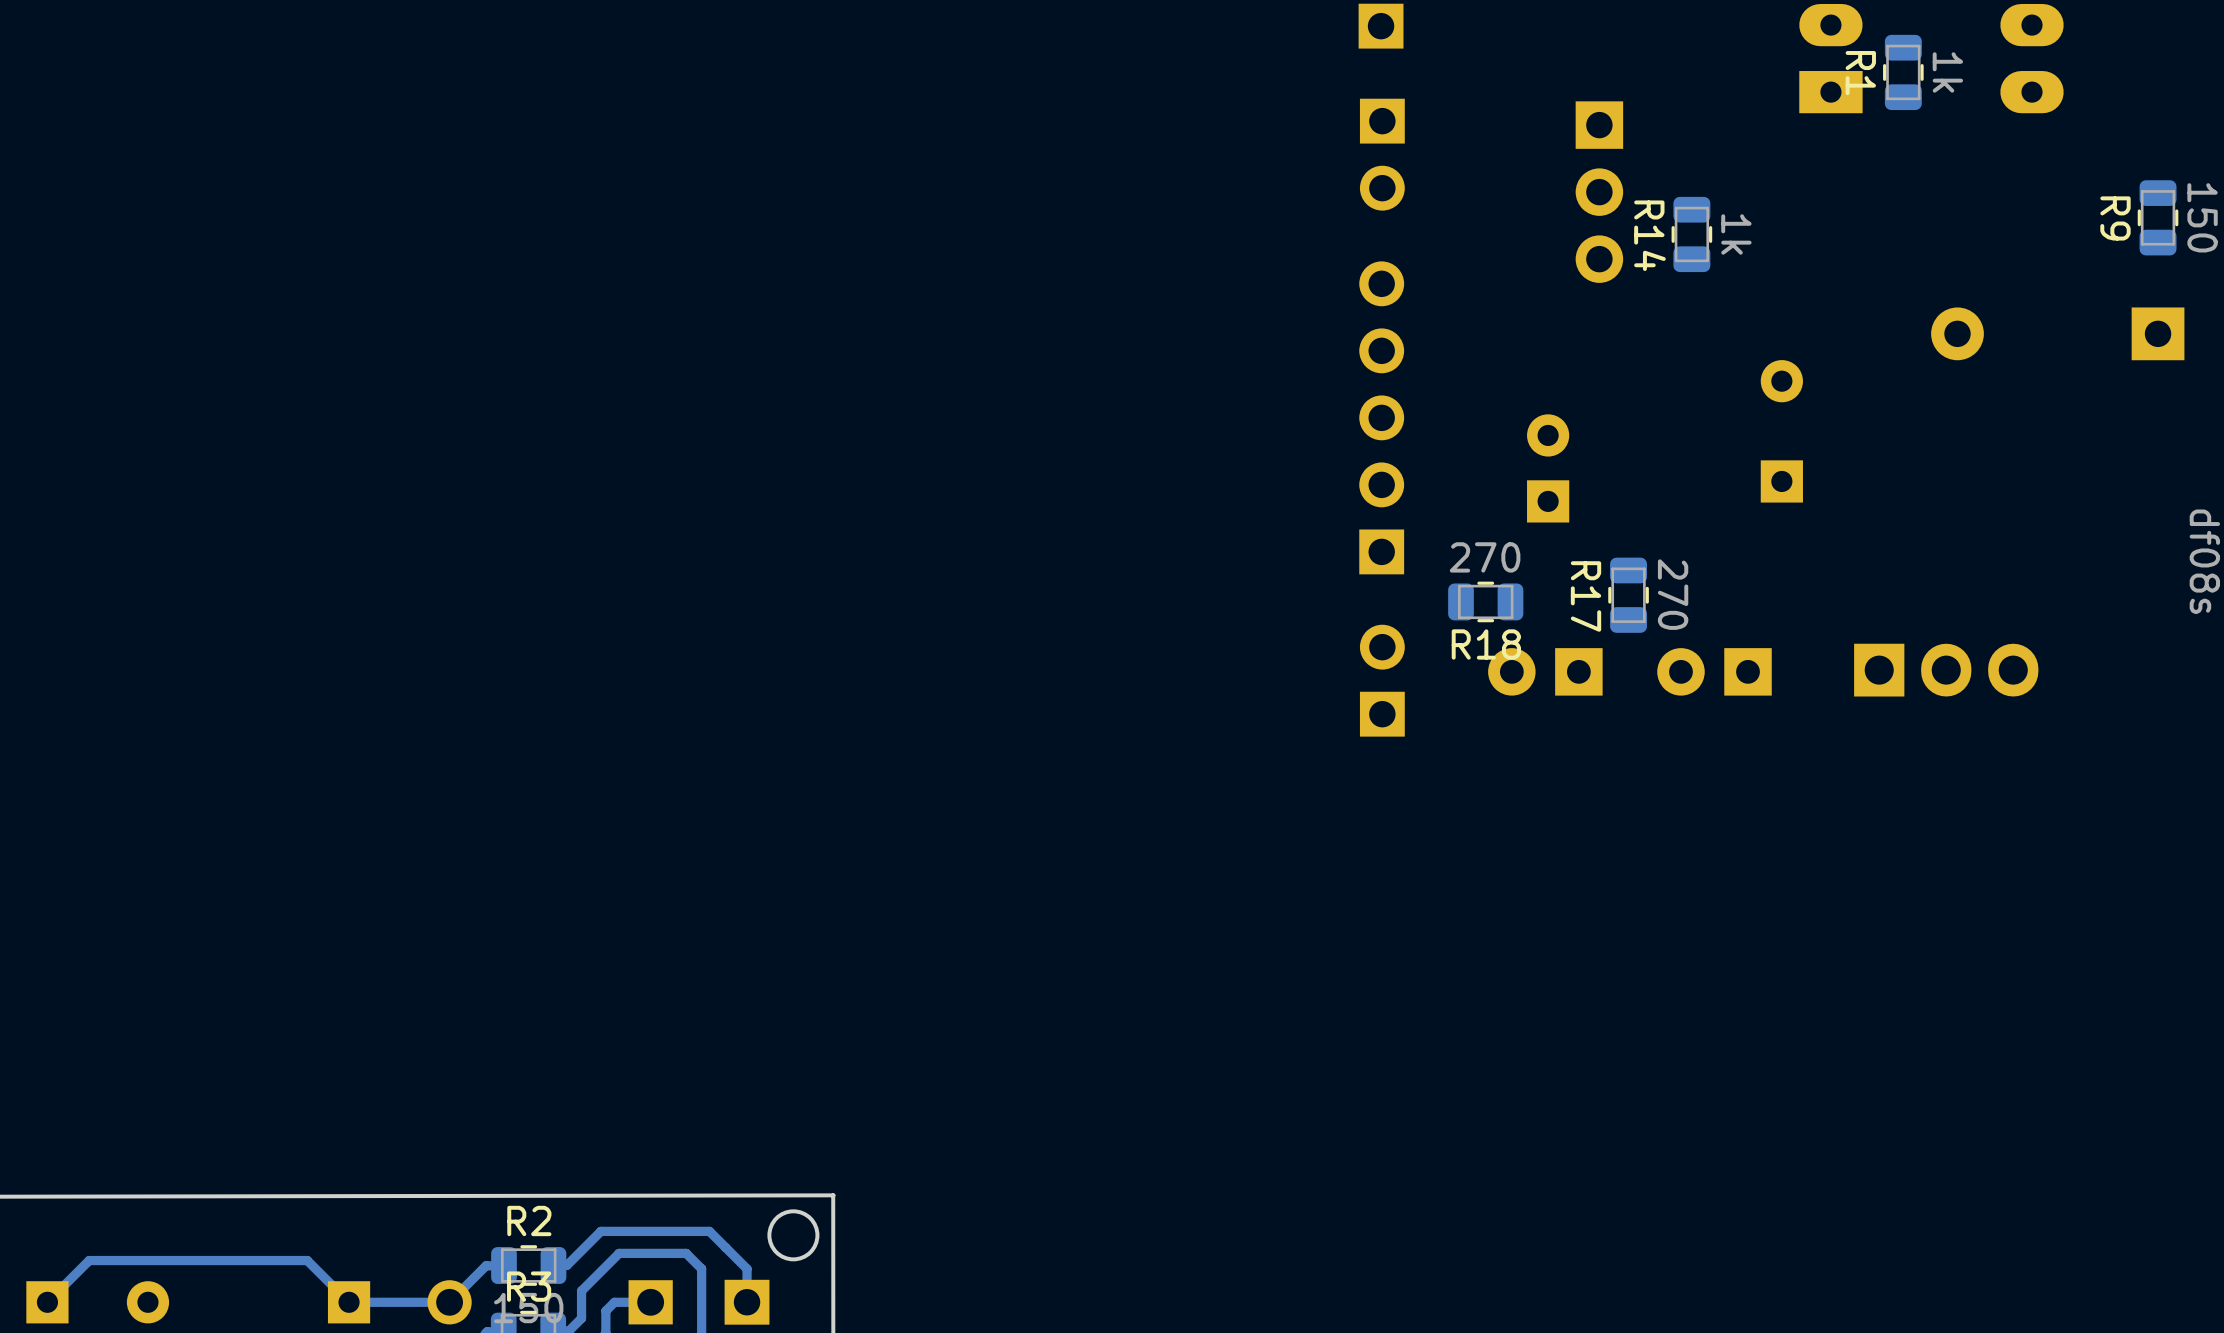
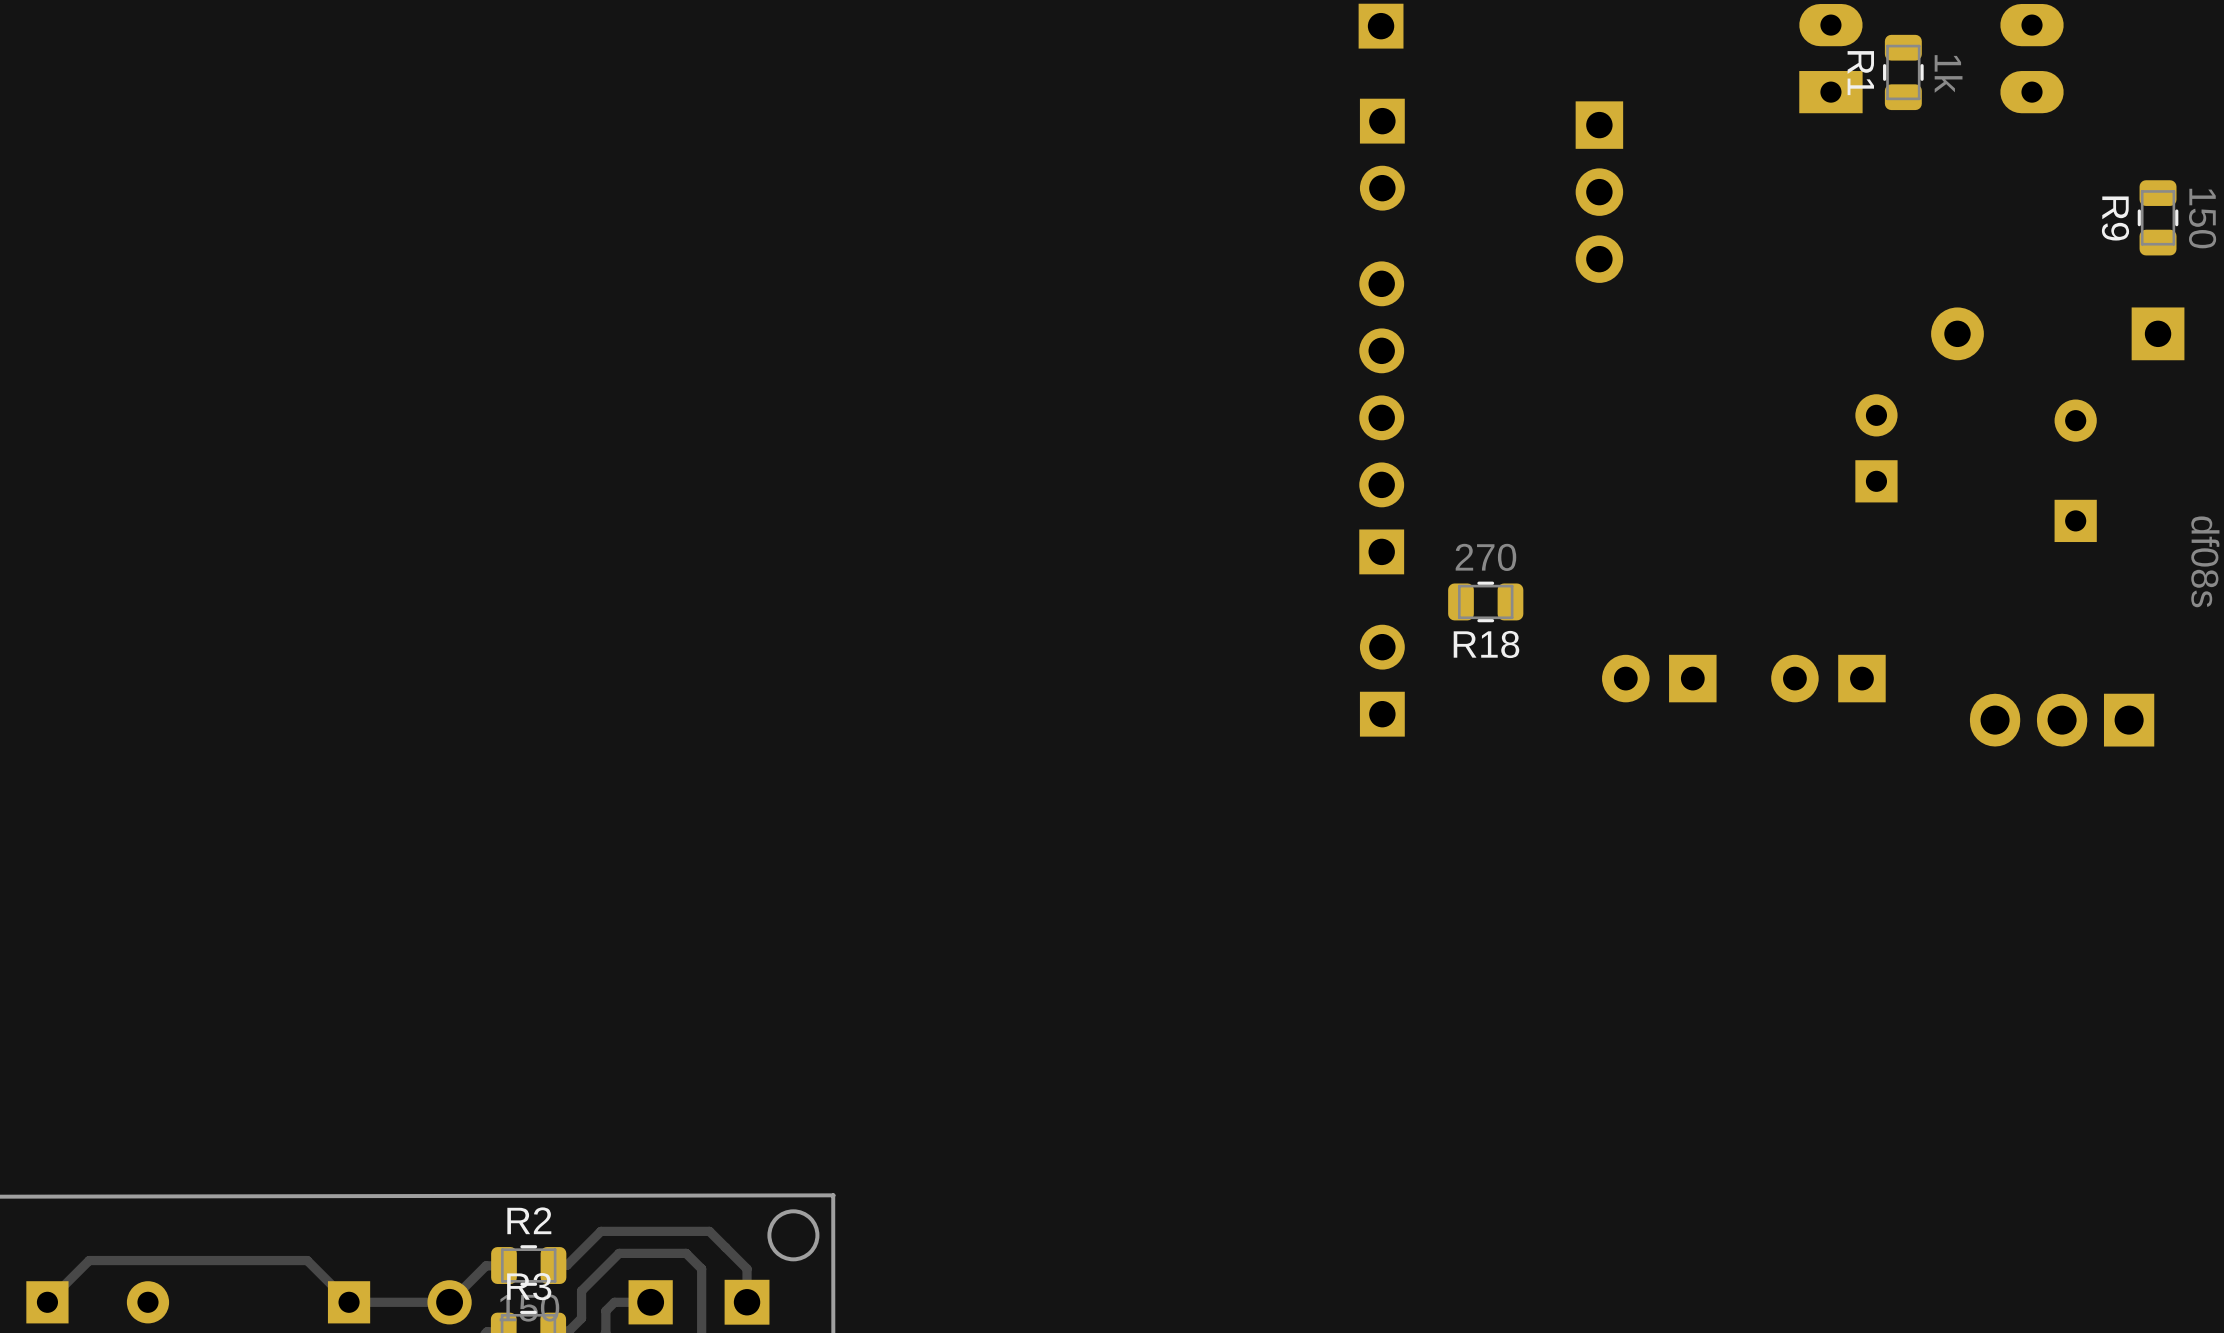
R14: 1k (1691, 234) -> none
part position: (1781, 431) -> (2075, 470)
part position: (1548, 468) -> (1876, 448)
R17: 270 (1628, 595) -> none
part rotation: 0° (1946, 670) -> 180° (2062, 720)
part position: (1946, 670) -> (2062, 720)
part: (1545, 671) -> none
part position: (1714, 671) -> (1659, 678)
part: none -> (1828, 678)

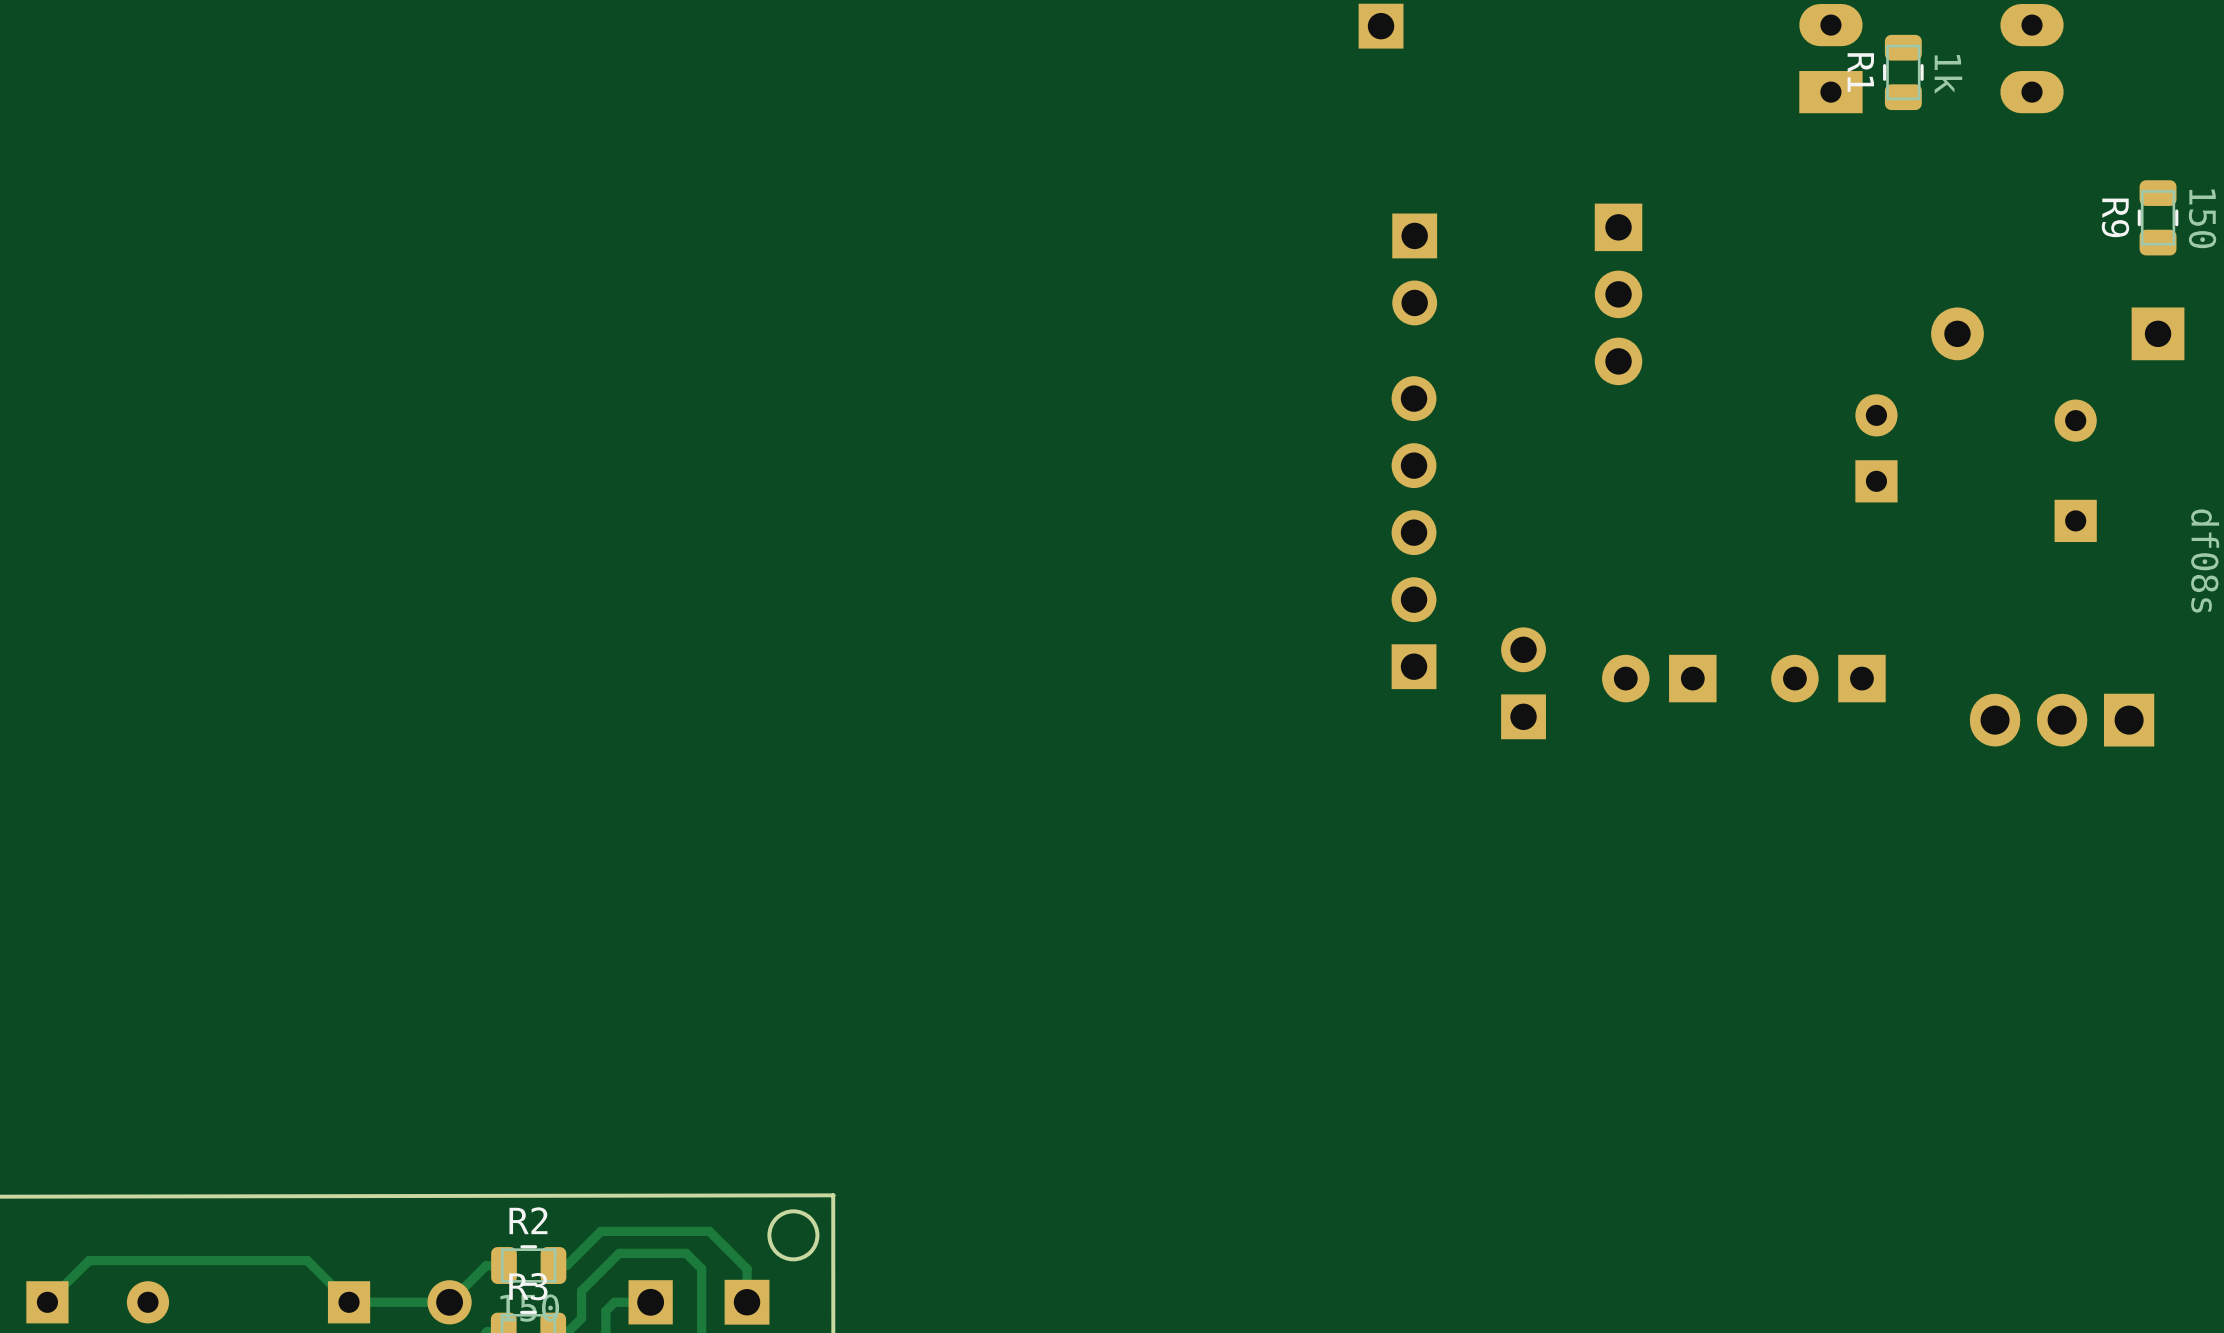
part position: (1382, 154) -> (1414, 269)
part position: (1599, 192) -> (1618, 294)
part position: (1381, 417) -> (1414, 532)
R18: 270 (1485, 601) -> none
part position: (1382, 680) -> (1523, 683)

